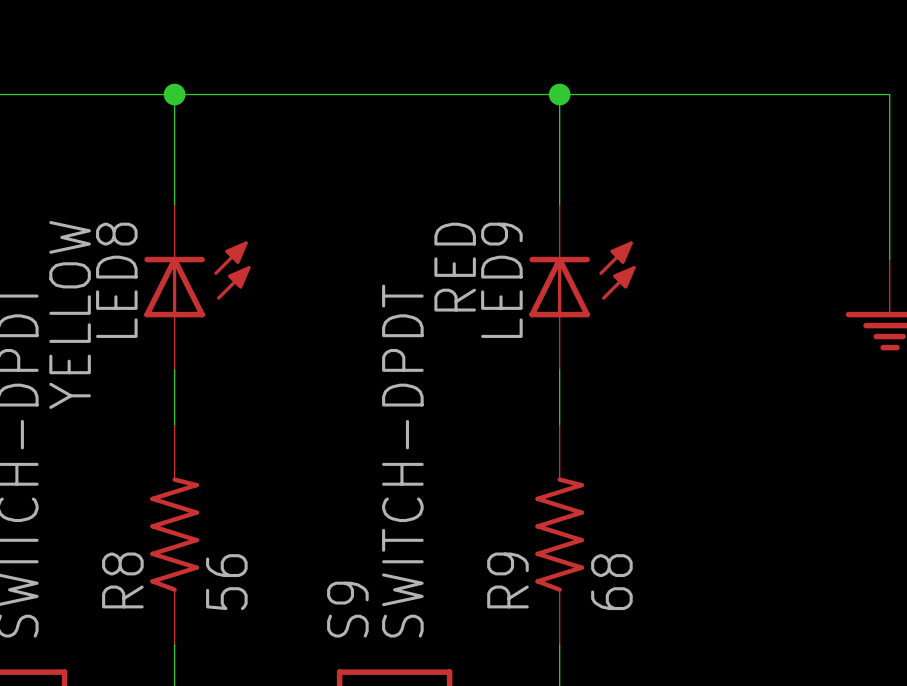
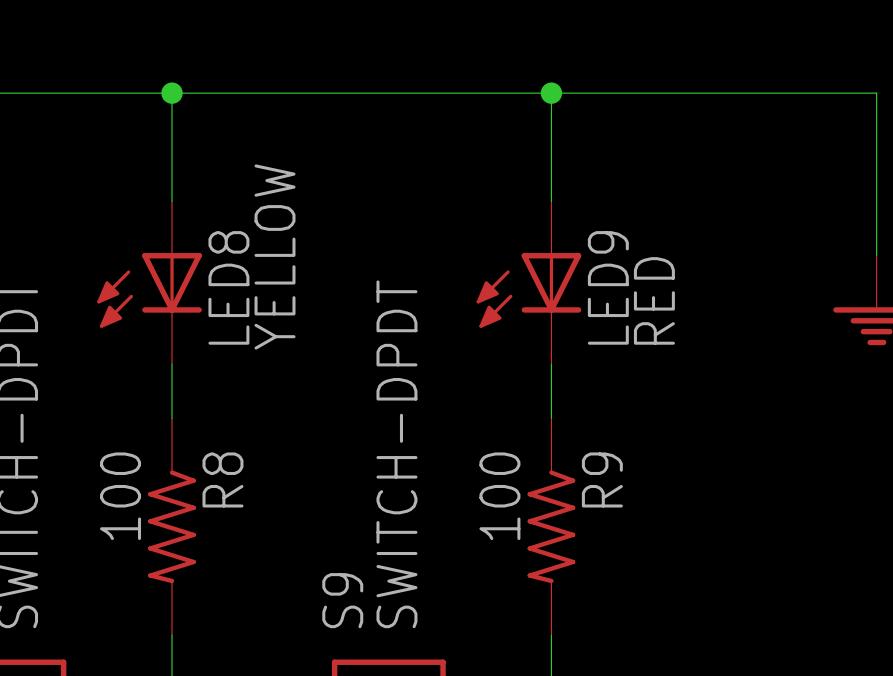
LED8 rotation: 0° (197, 279) -> 180° (149, 290)
LED9 rotation: 0° (582, 279) -> 180° (528, 290)
R8 rotation: 0° (174, 534) -> 180° (172, 526)
R9 rotation: 0° (559, 534) -> 180° (551, 526)
R8 value: 56 (226, 582) -> 100 (120, 496)
R9 value: 68 (611, 582) -> 100 (499, 496)

